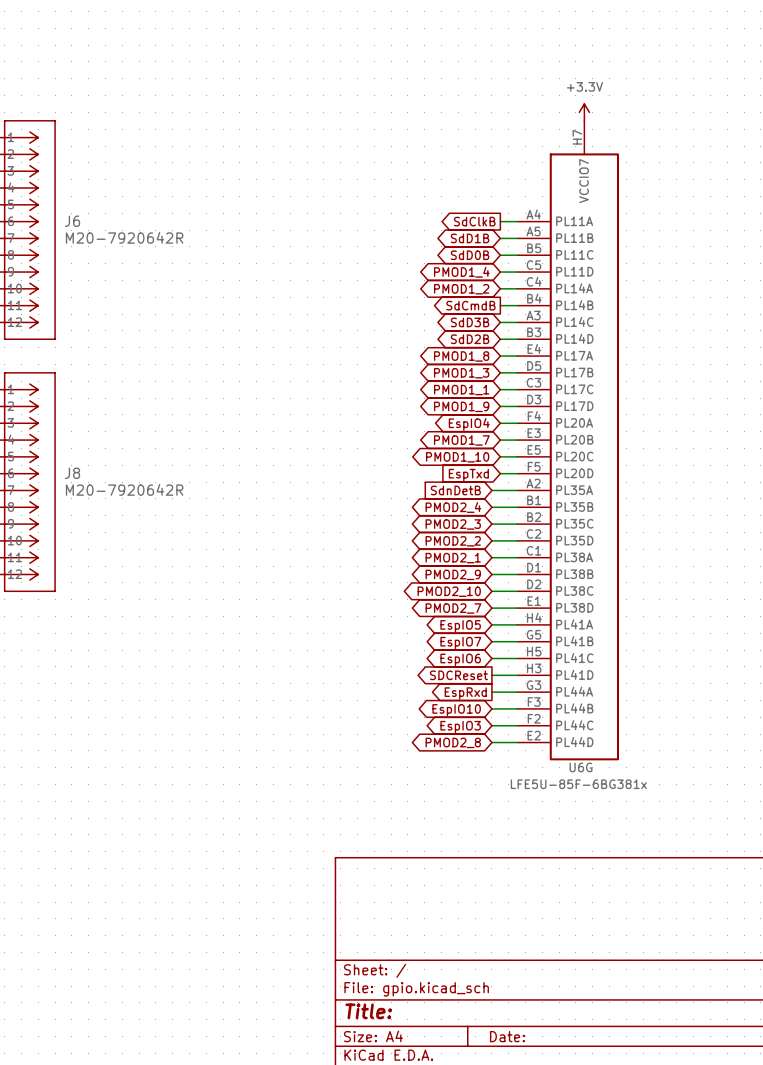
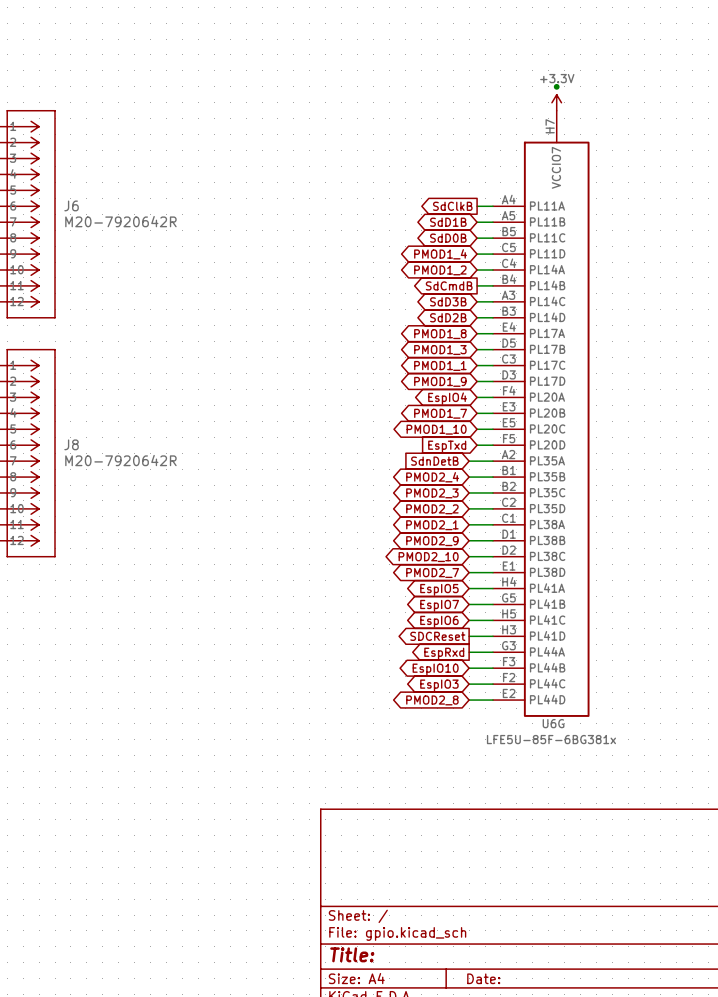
junction: none -> (556, 86)

